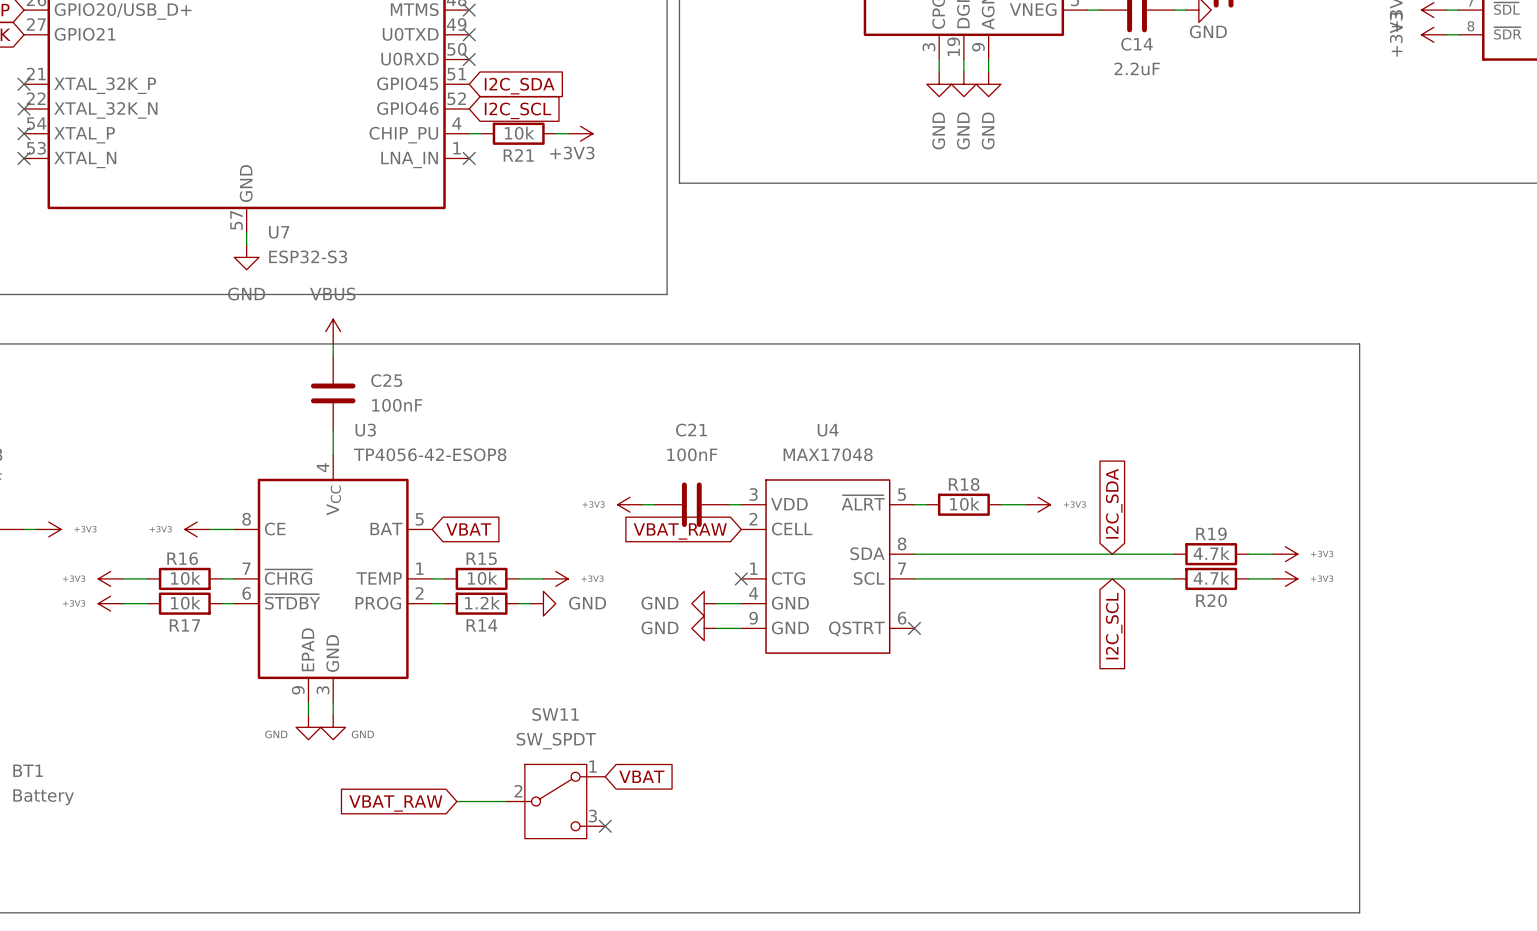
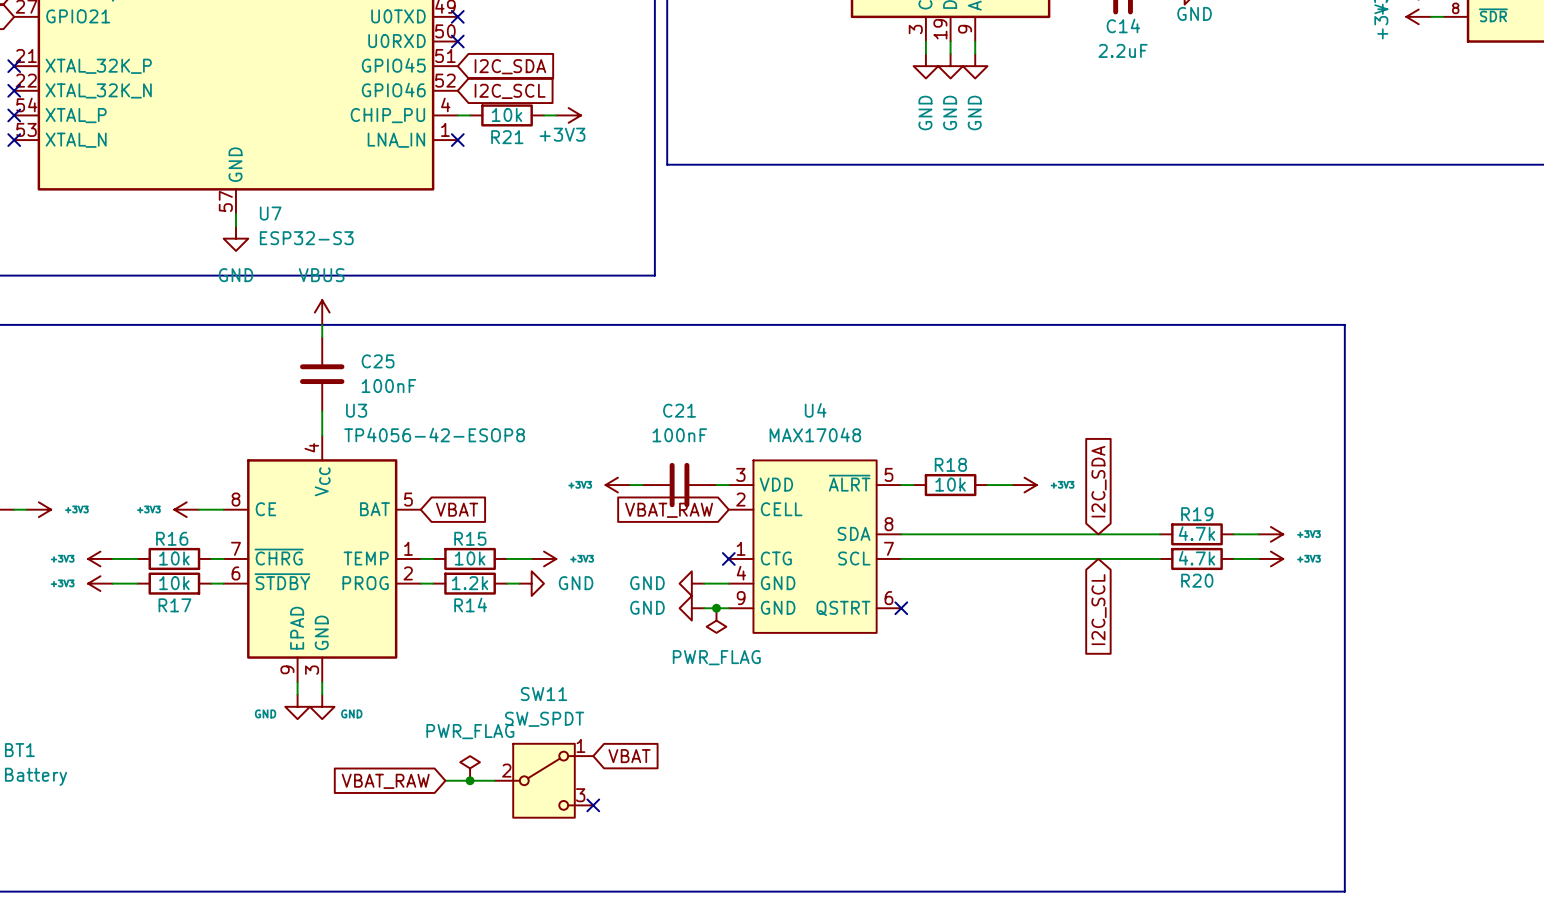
junction: none -> (716, 608)
power symbol: none -> PWR_FLAG (716, 620)
power symbol: none -> PWR_FLAG (470, 768)
junction: none -> (470, 780)

